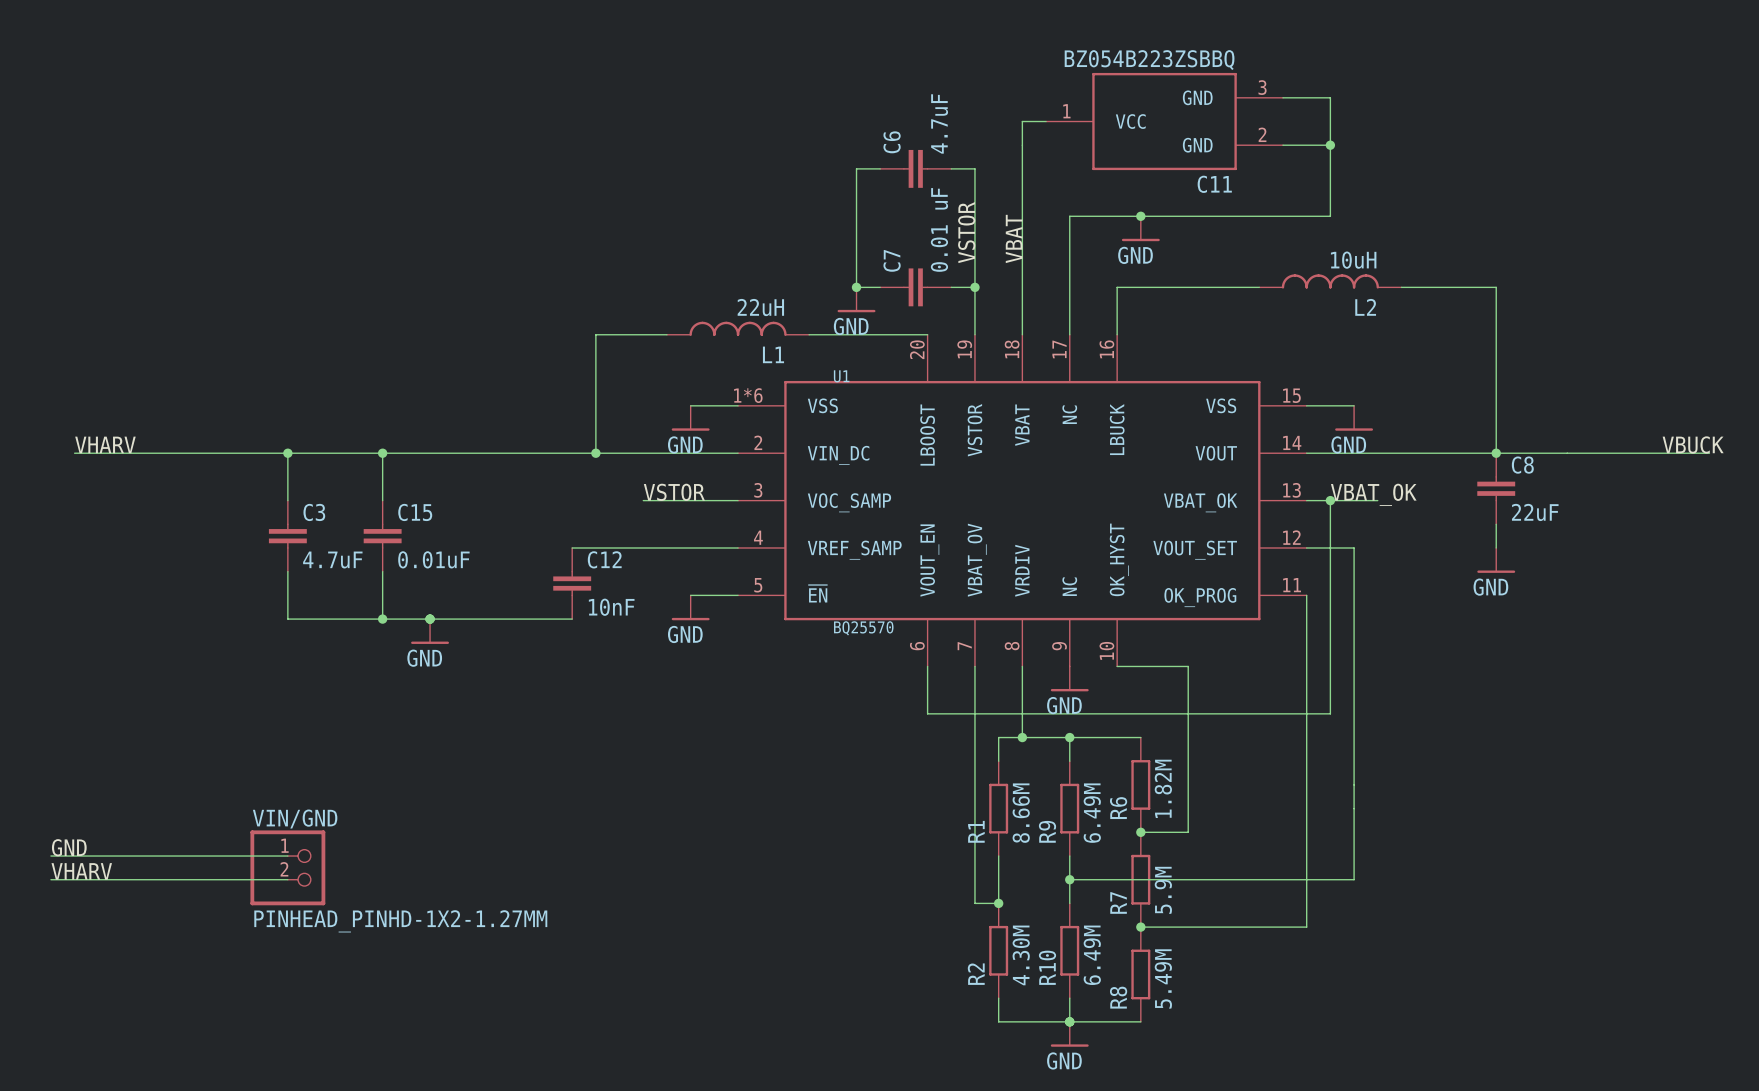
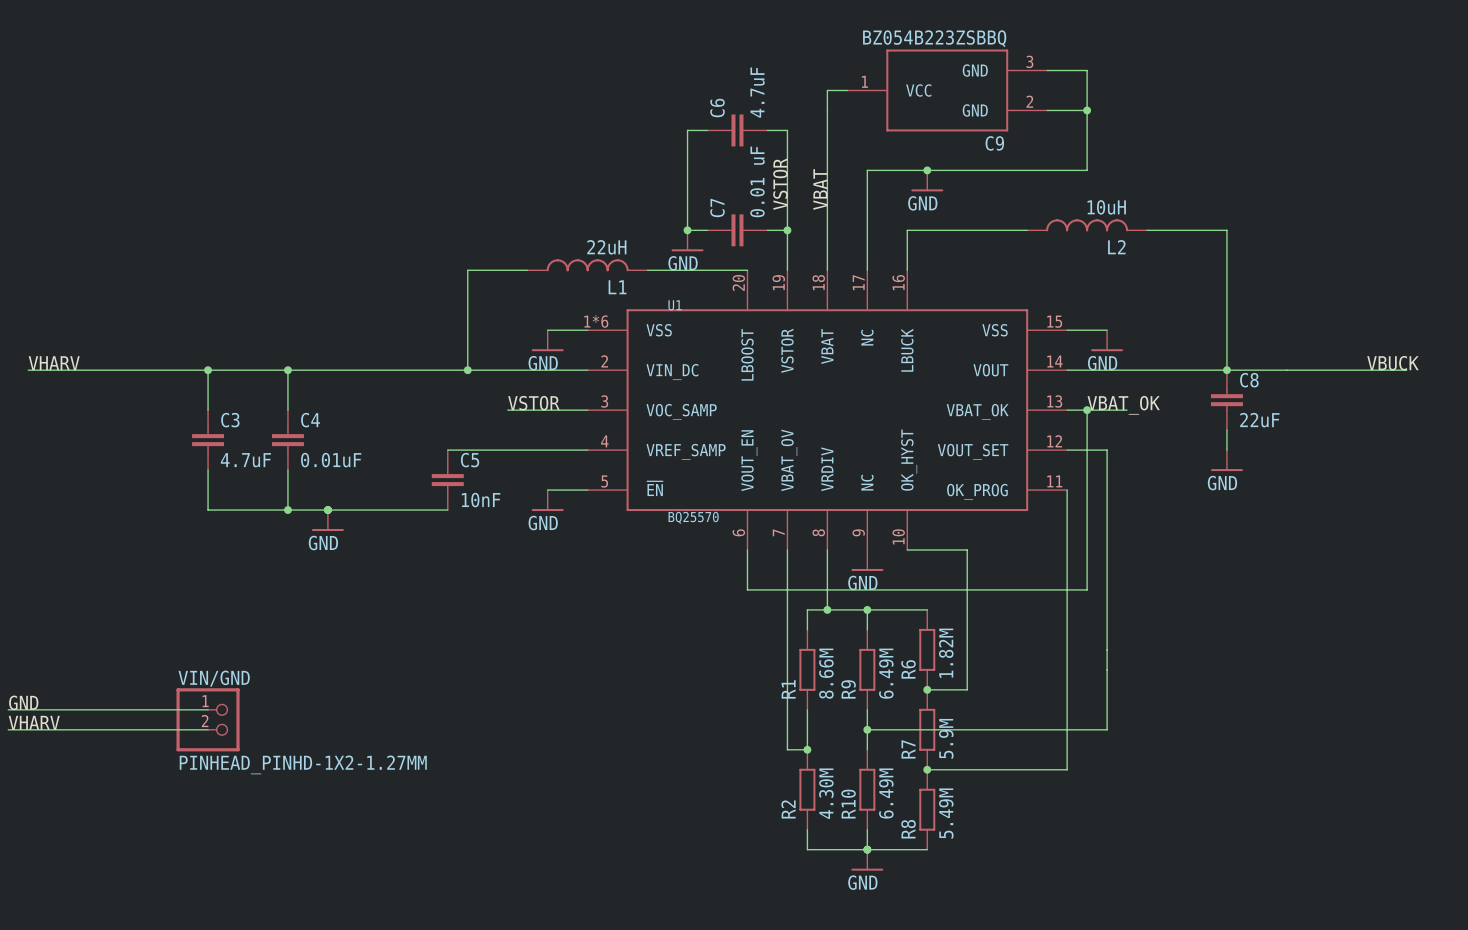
C11 name: C11 (1214, 184) -> C9 (994, 143)
C15 name: C15 (415, 512) -> C4 (310, 420)
C12 name: C12 (604, 559) -> C5 (470, 460)

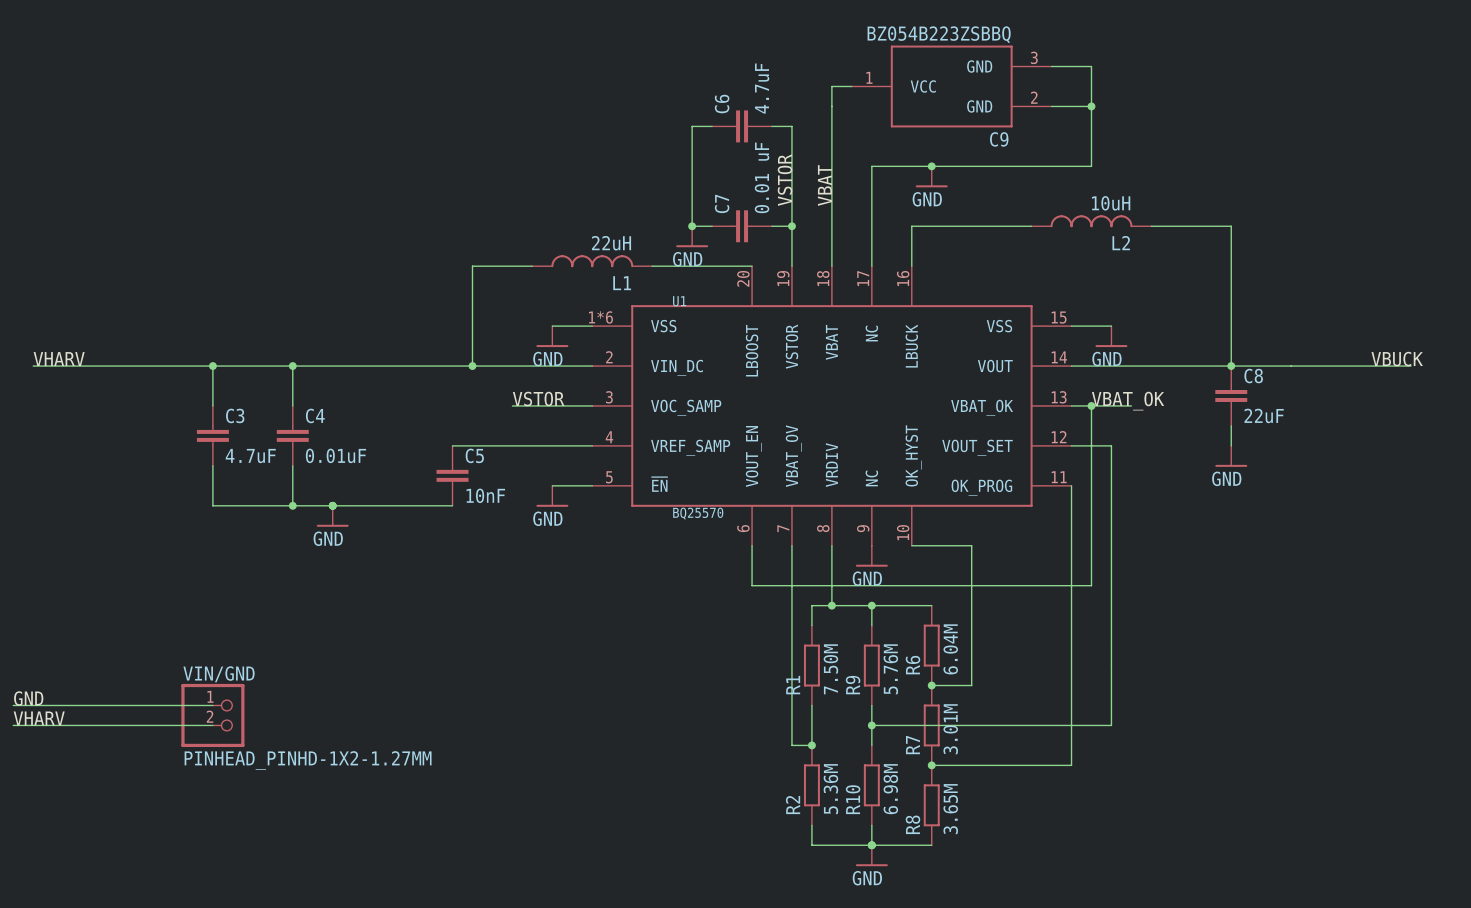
R6 value: 1.82M (946, 653) -> 6.04M (950, 649)
R1 value: 8.66M (826, 673) -> 7.50M (830, 669)
R9 value: 6.49M (886, 673) -> 5.76M (890, 669)
R7 value: 5.9M (946, 738) -> 3.01M (950, 729)
R2 value: 4.30M (826, 793) -> 5.36M (830, 789)
R10 value: 6.49M (886, 793) -> 6.98M (890, 789)
R8 value: 5.49M (946, 813) -> 3.65M (950, 809)

